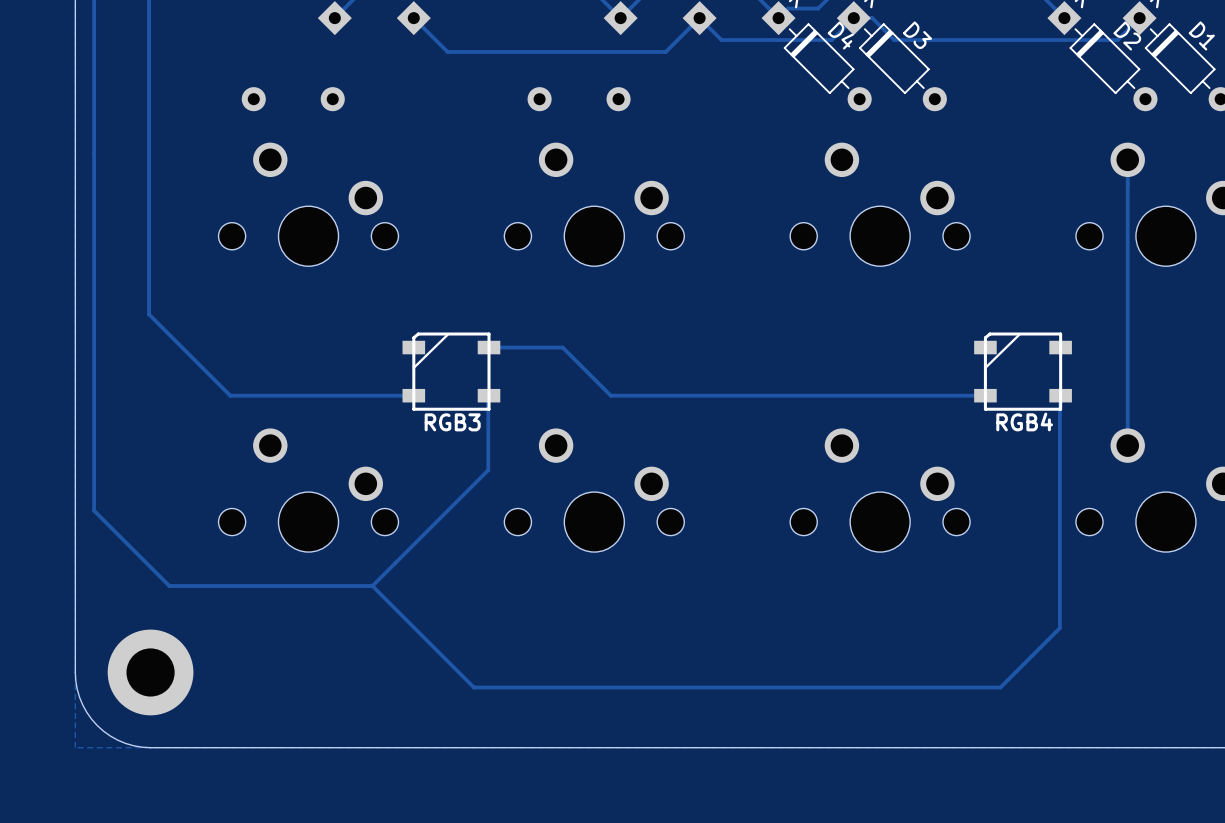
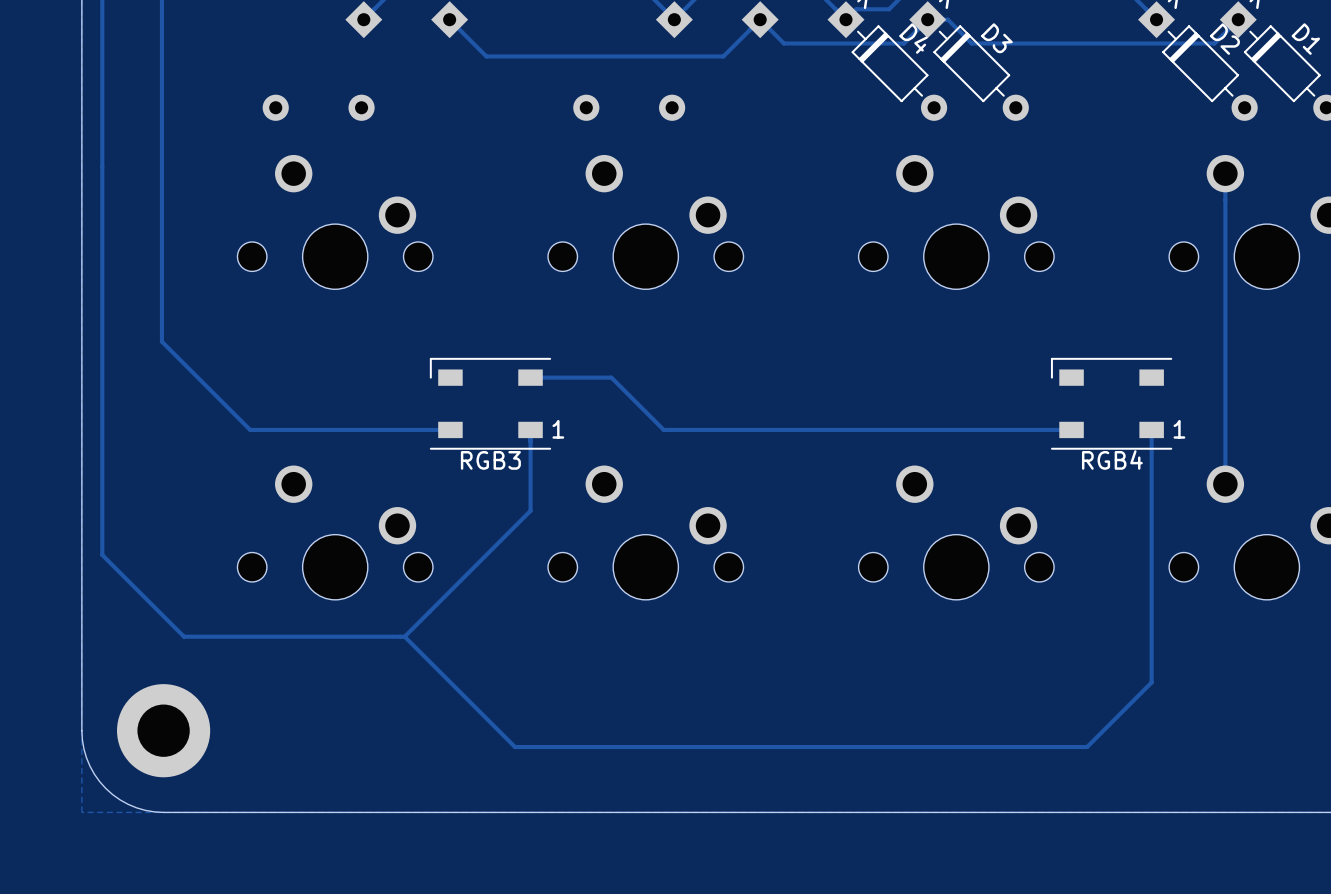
RGB3 footprint: [402, 332, 501, 411] -> [429, 357, 552, 450]
RGB4 footprint: [974, 332, 1072, 411] -> [1050, 357, 1173, 450]

